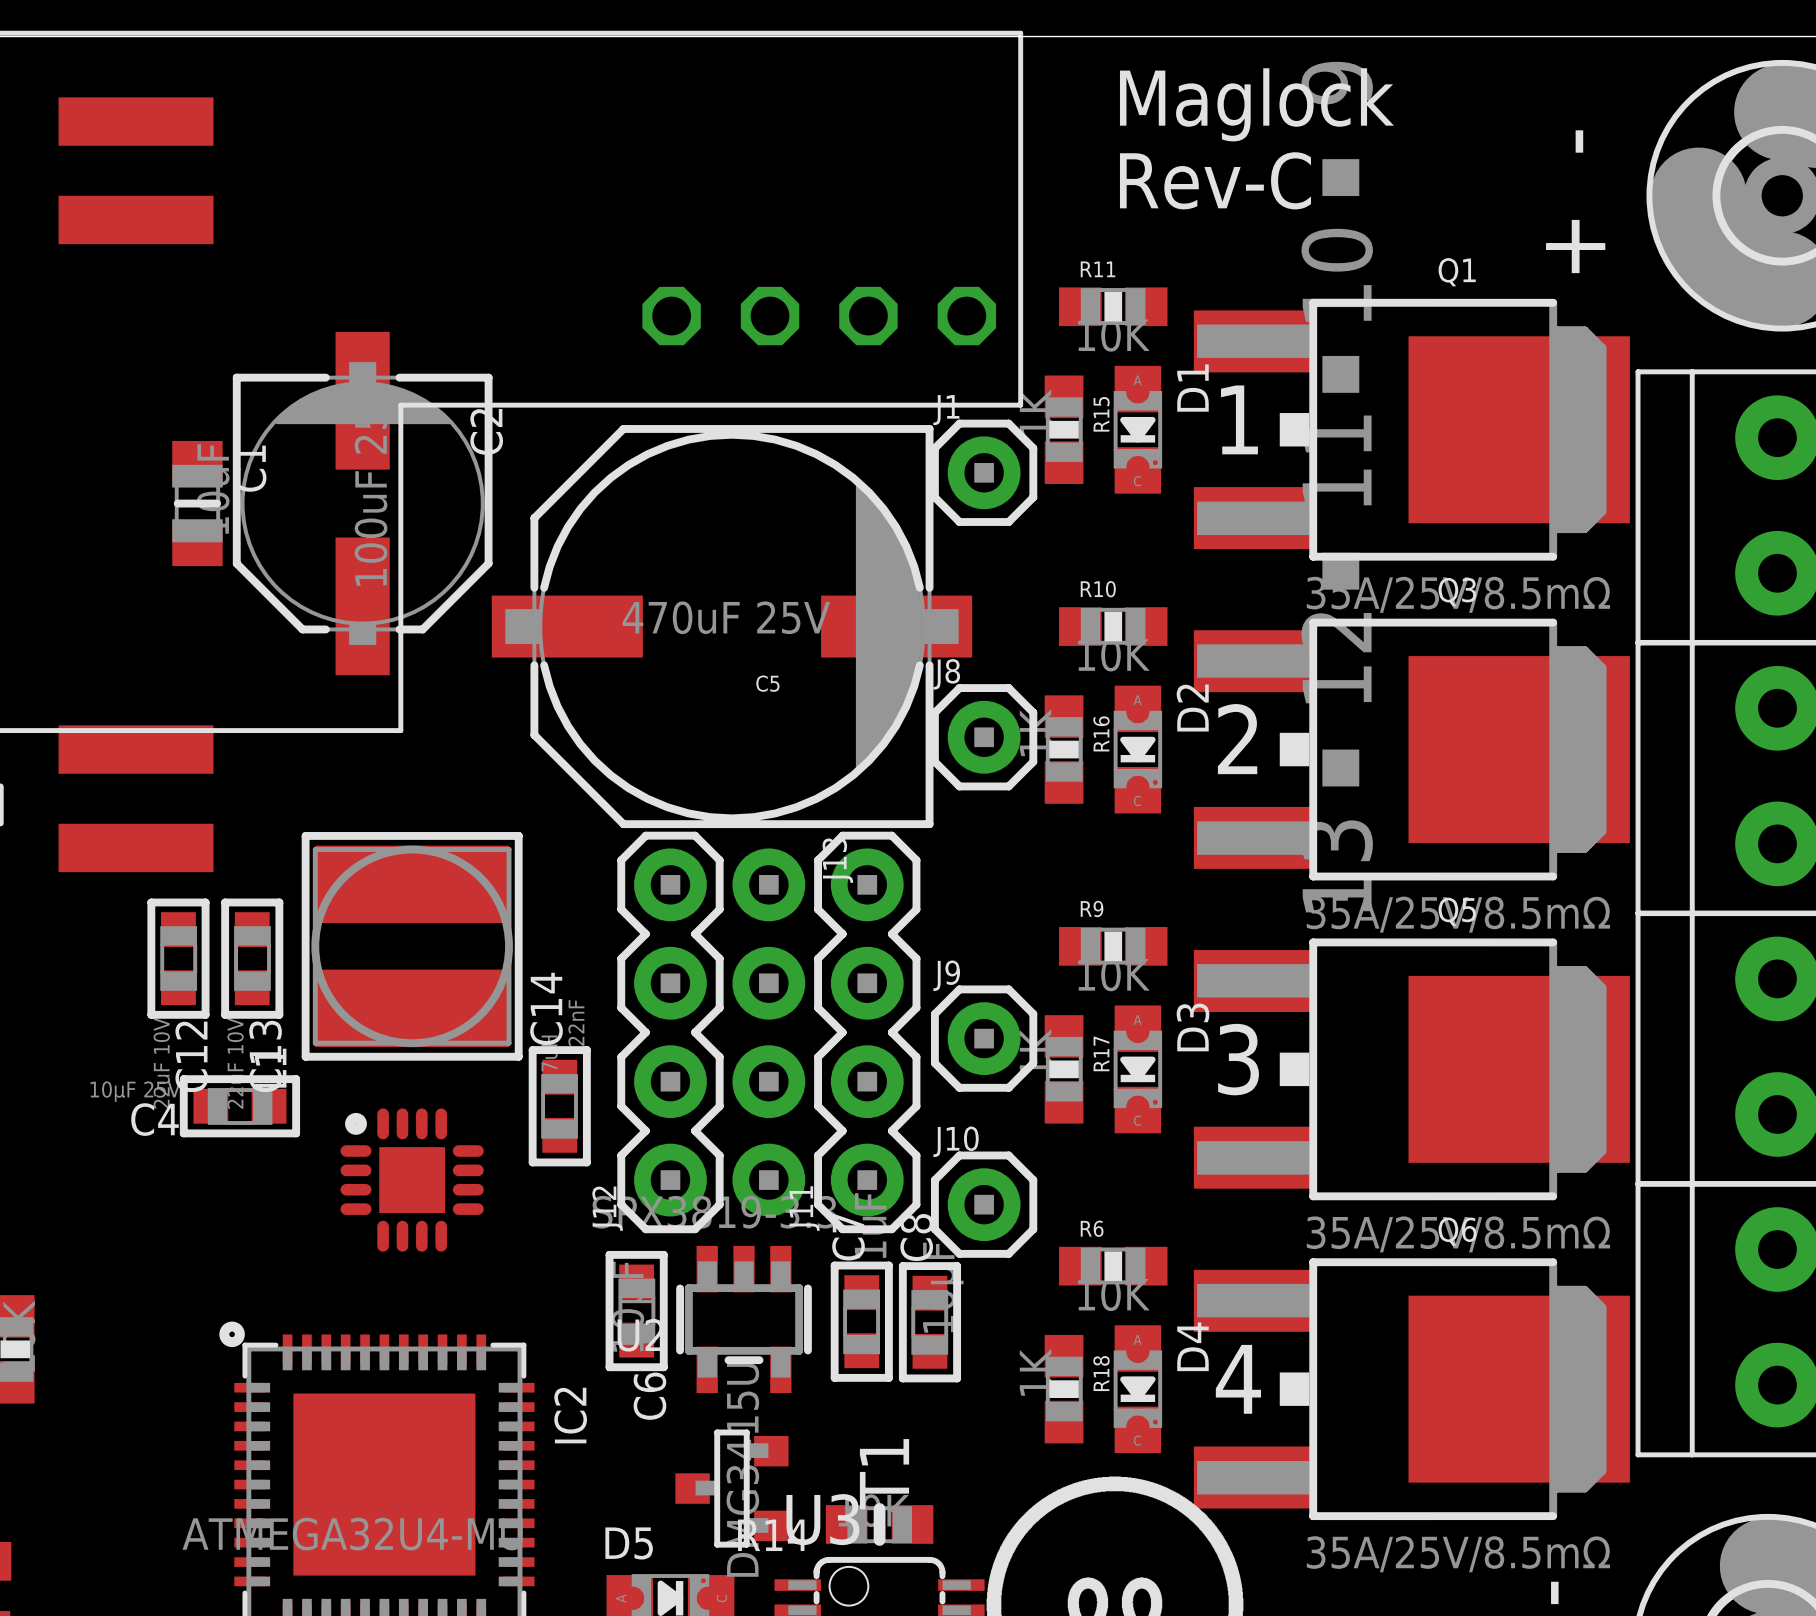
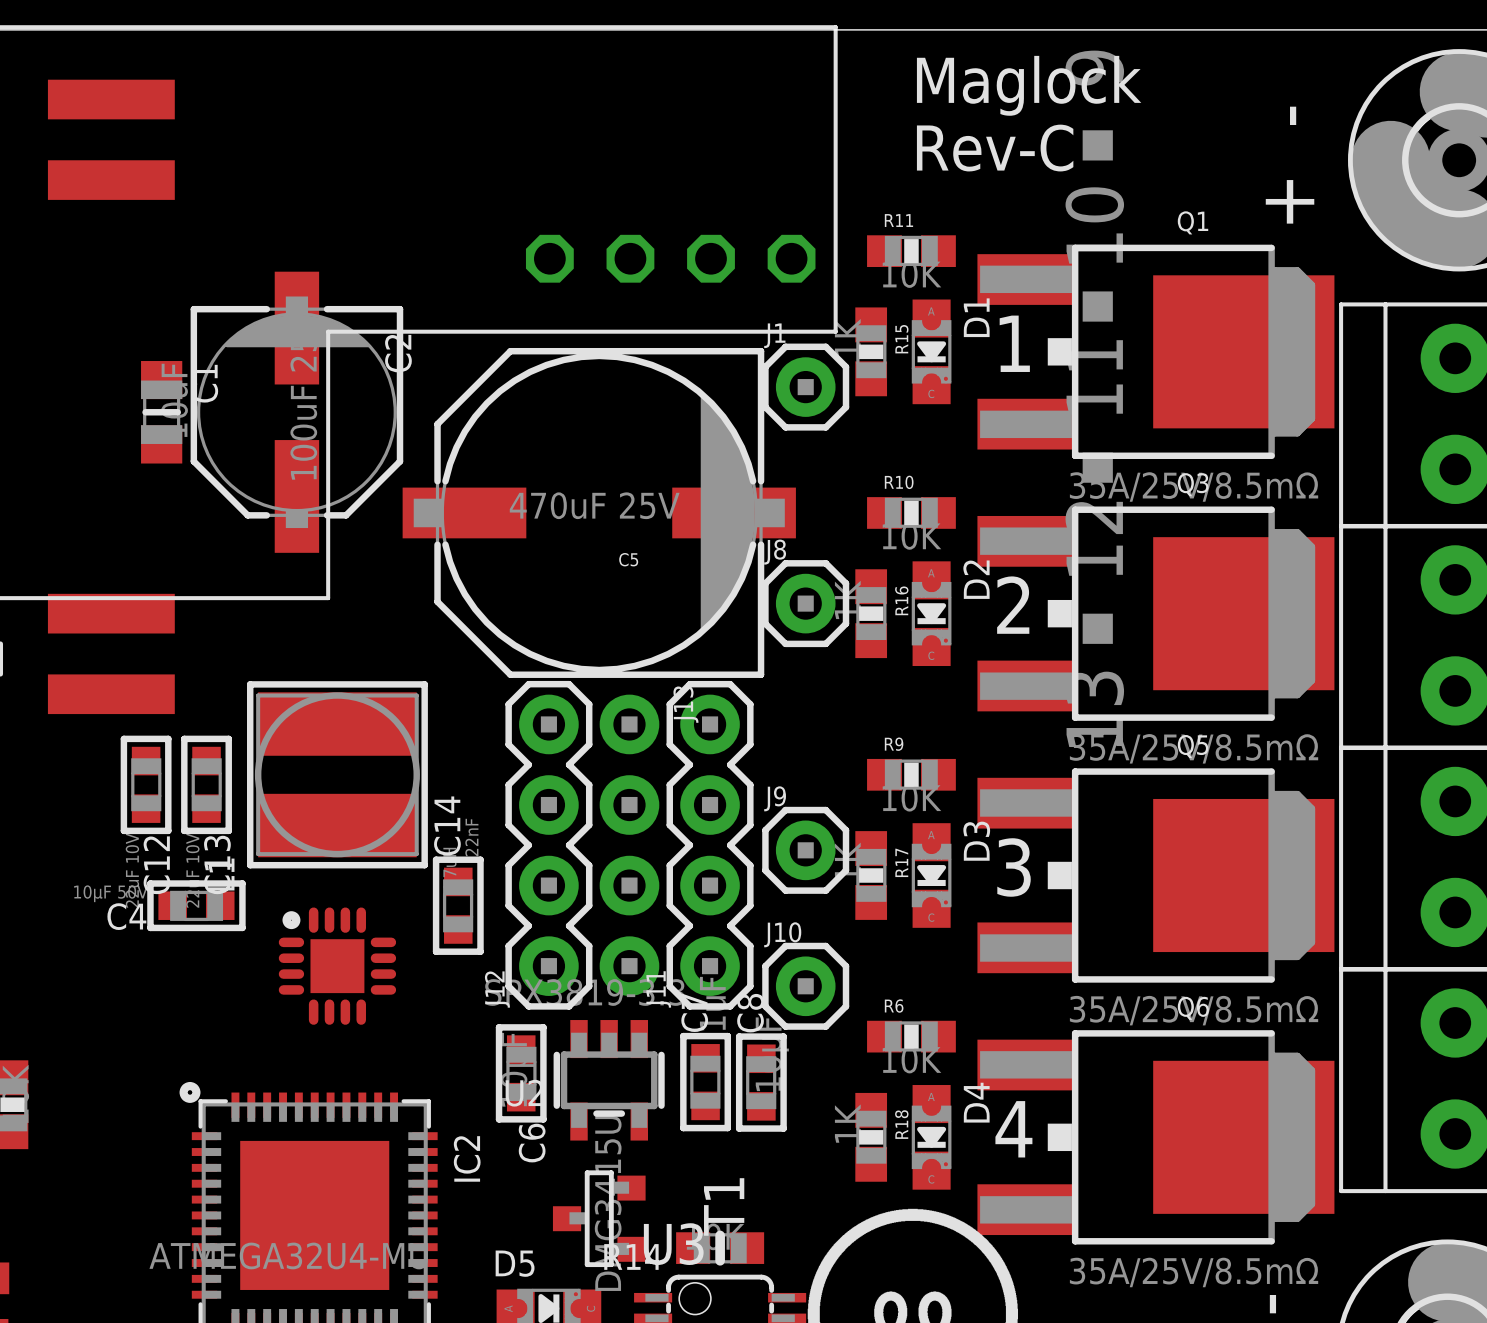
C4 value: 10µF 25V (135, 1091) -> 10µF 50V (111, 893)

